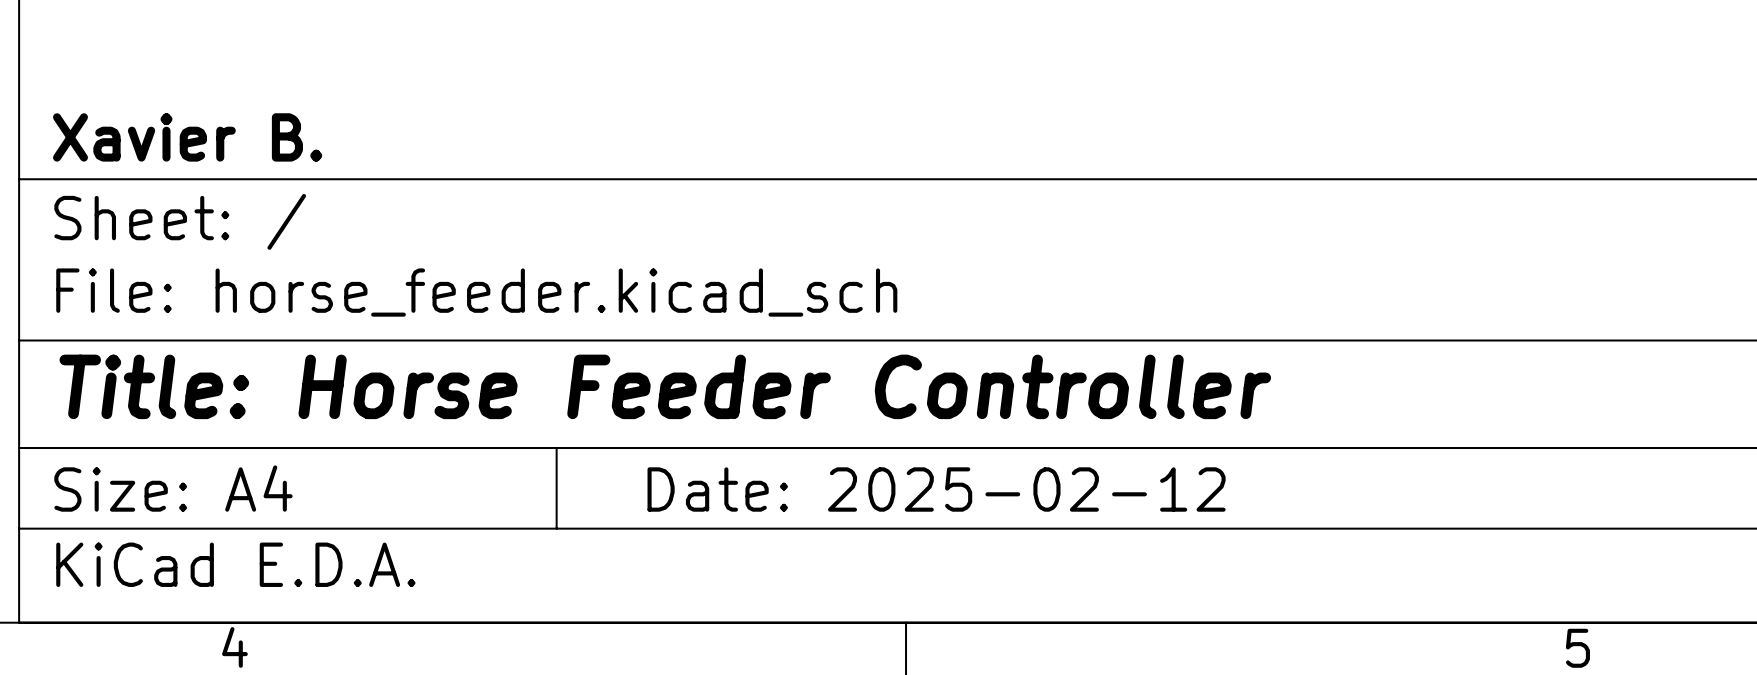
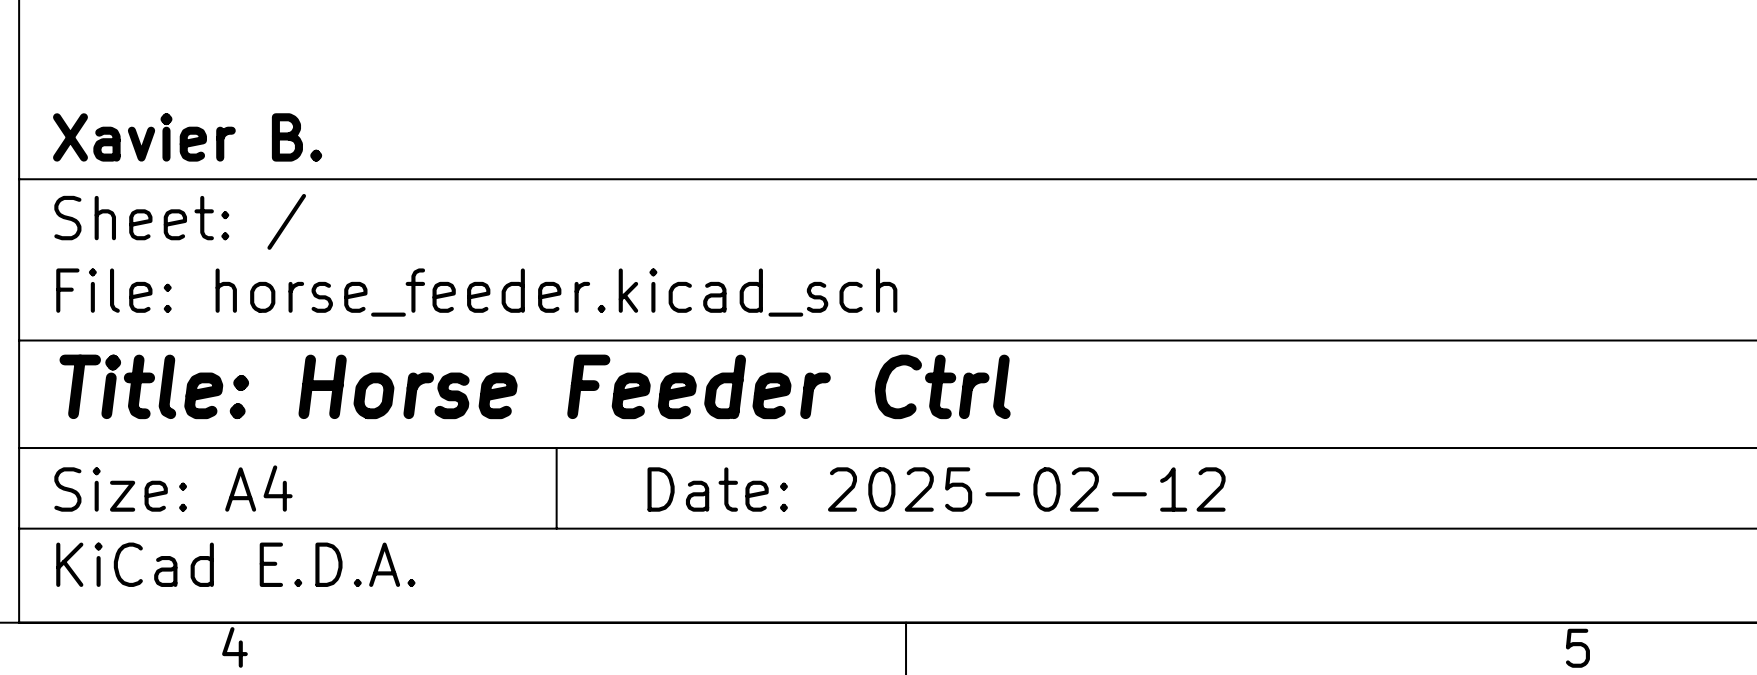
title block: Title: Horse Feeder Controller (665, 386) -> Title: Horse Feeder Ctrl (535, 386)

